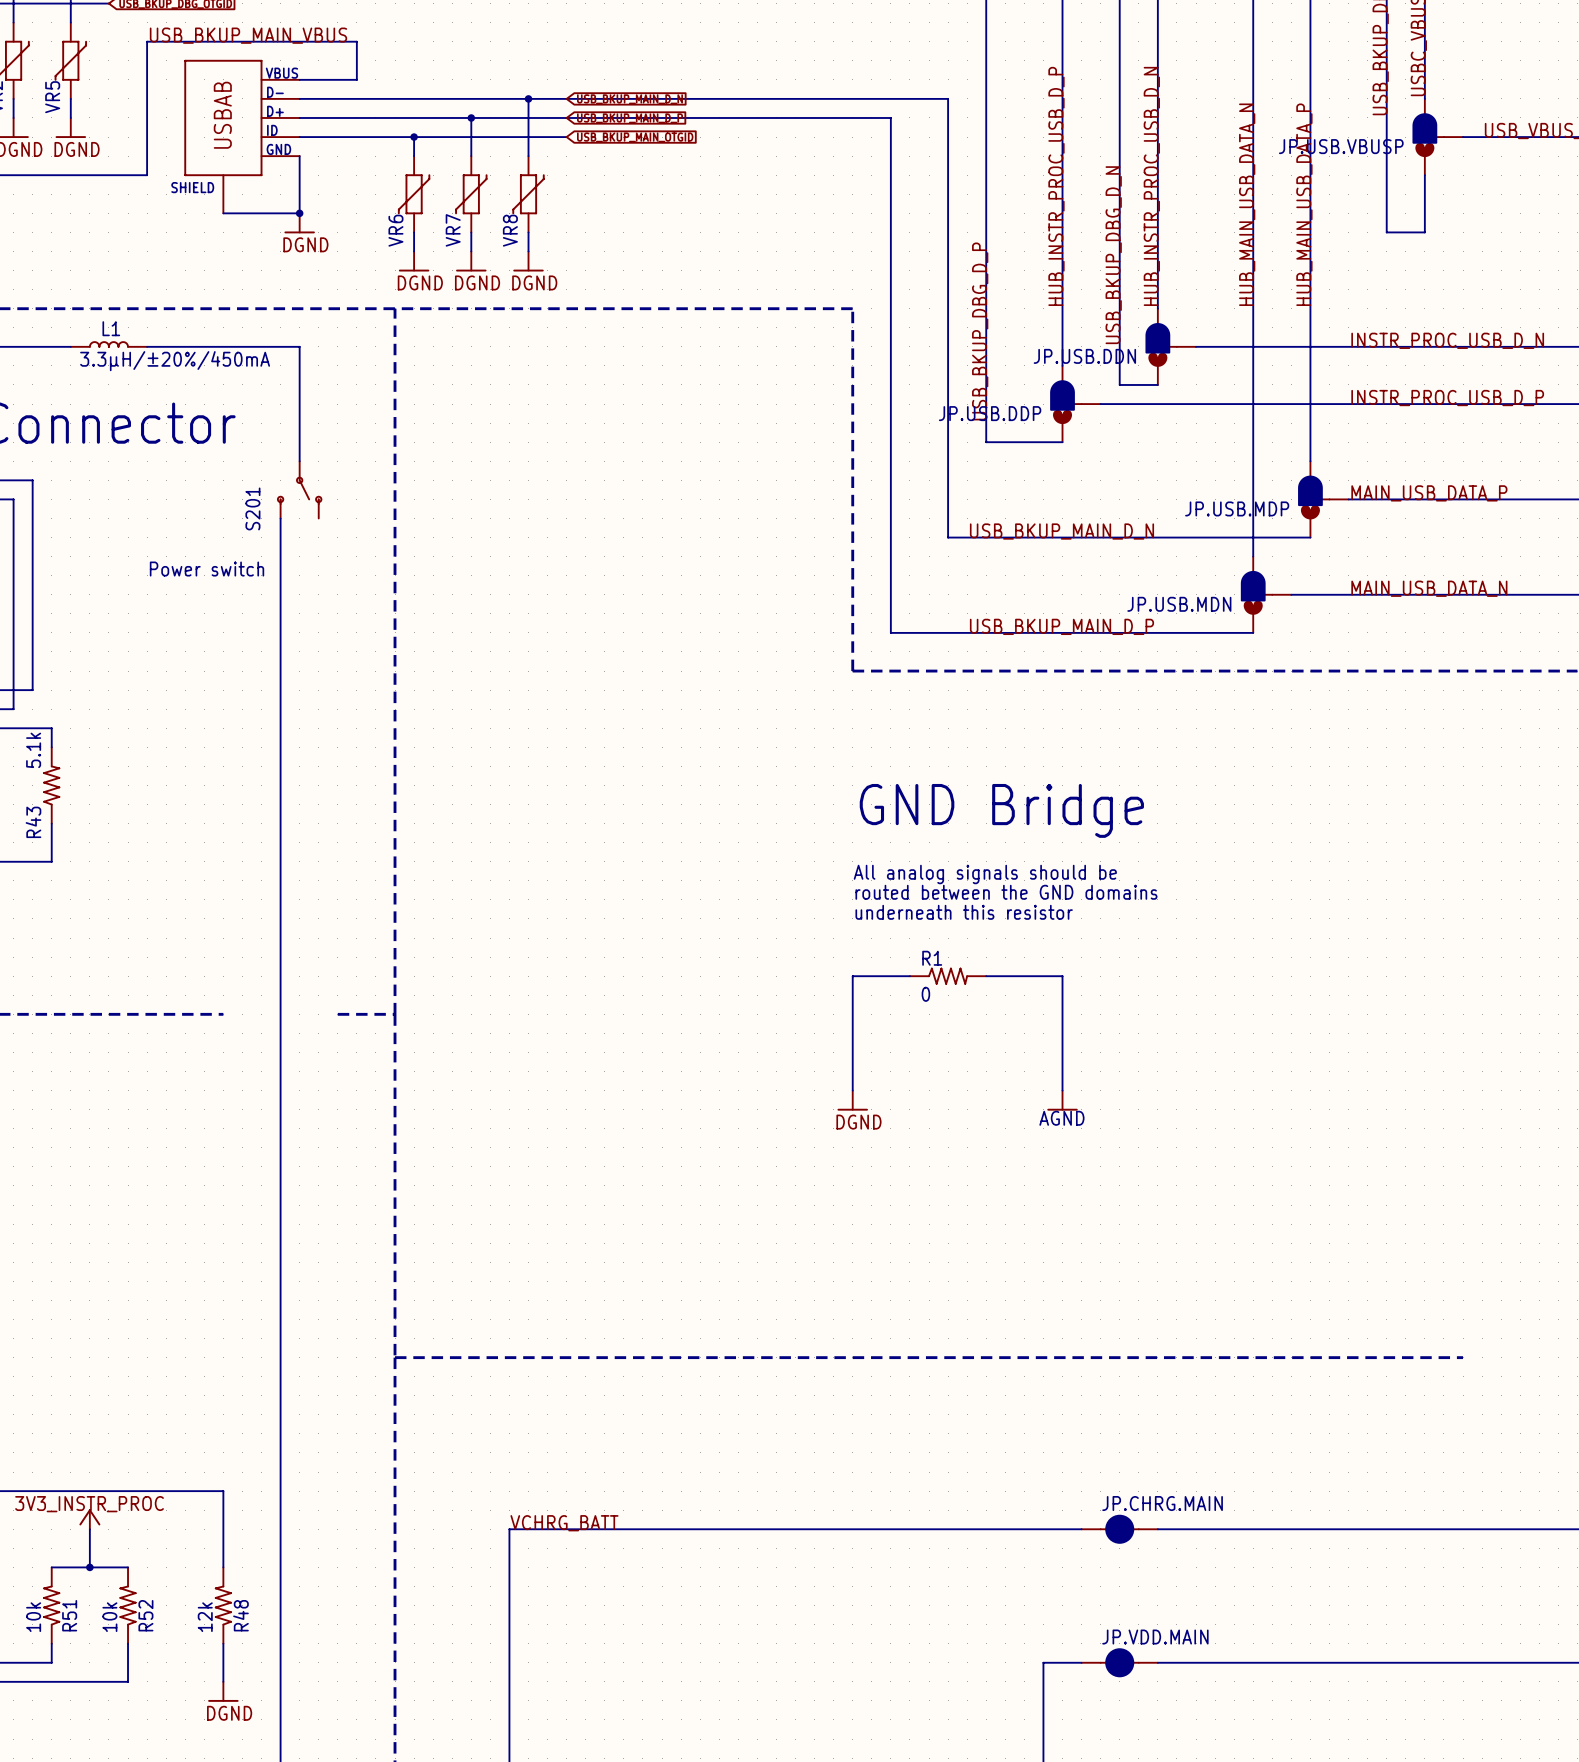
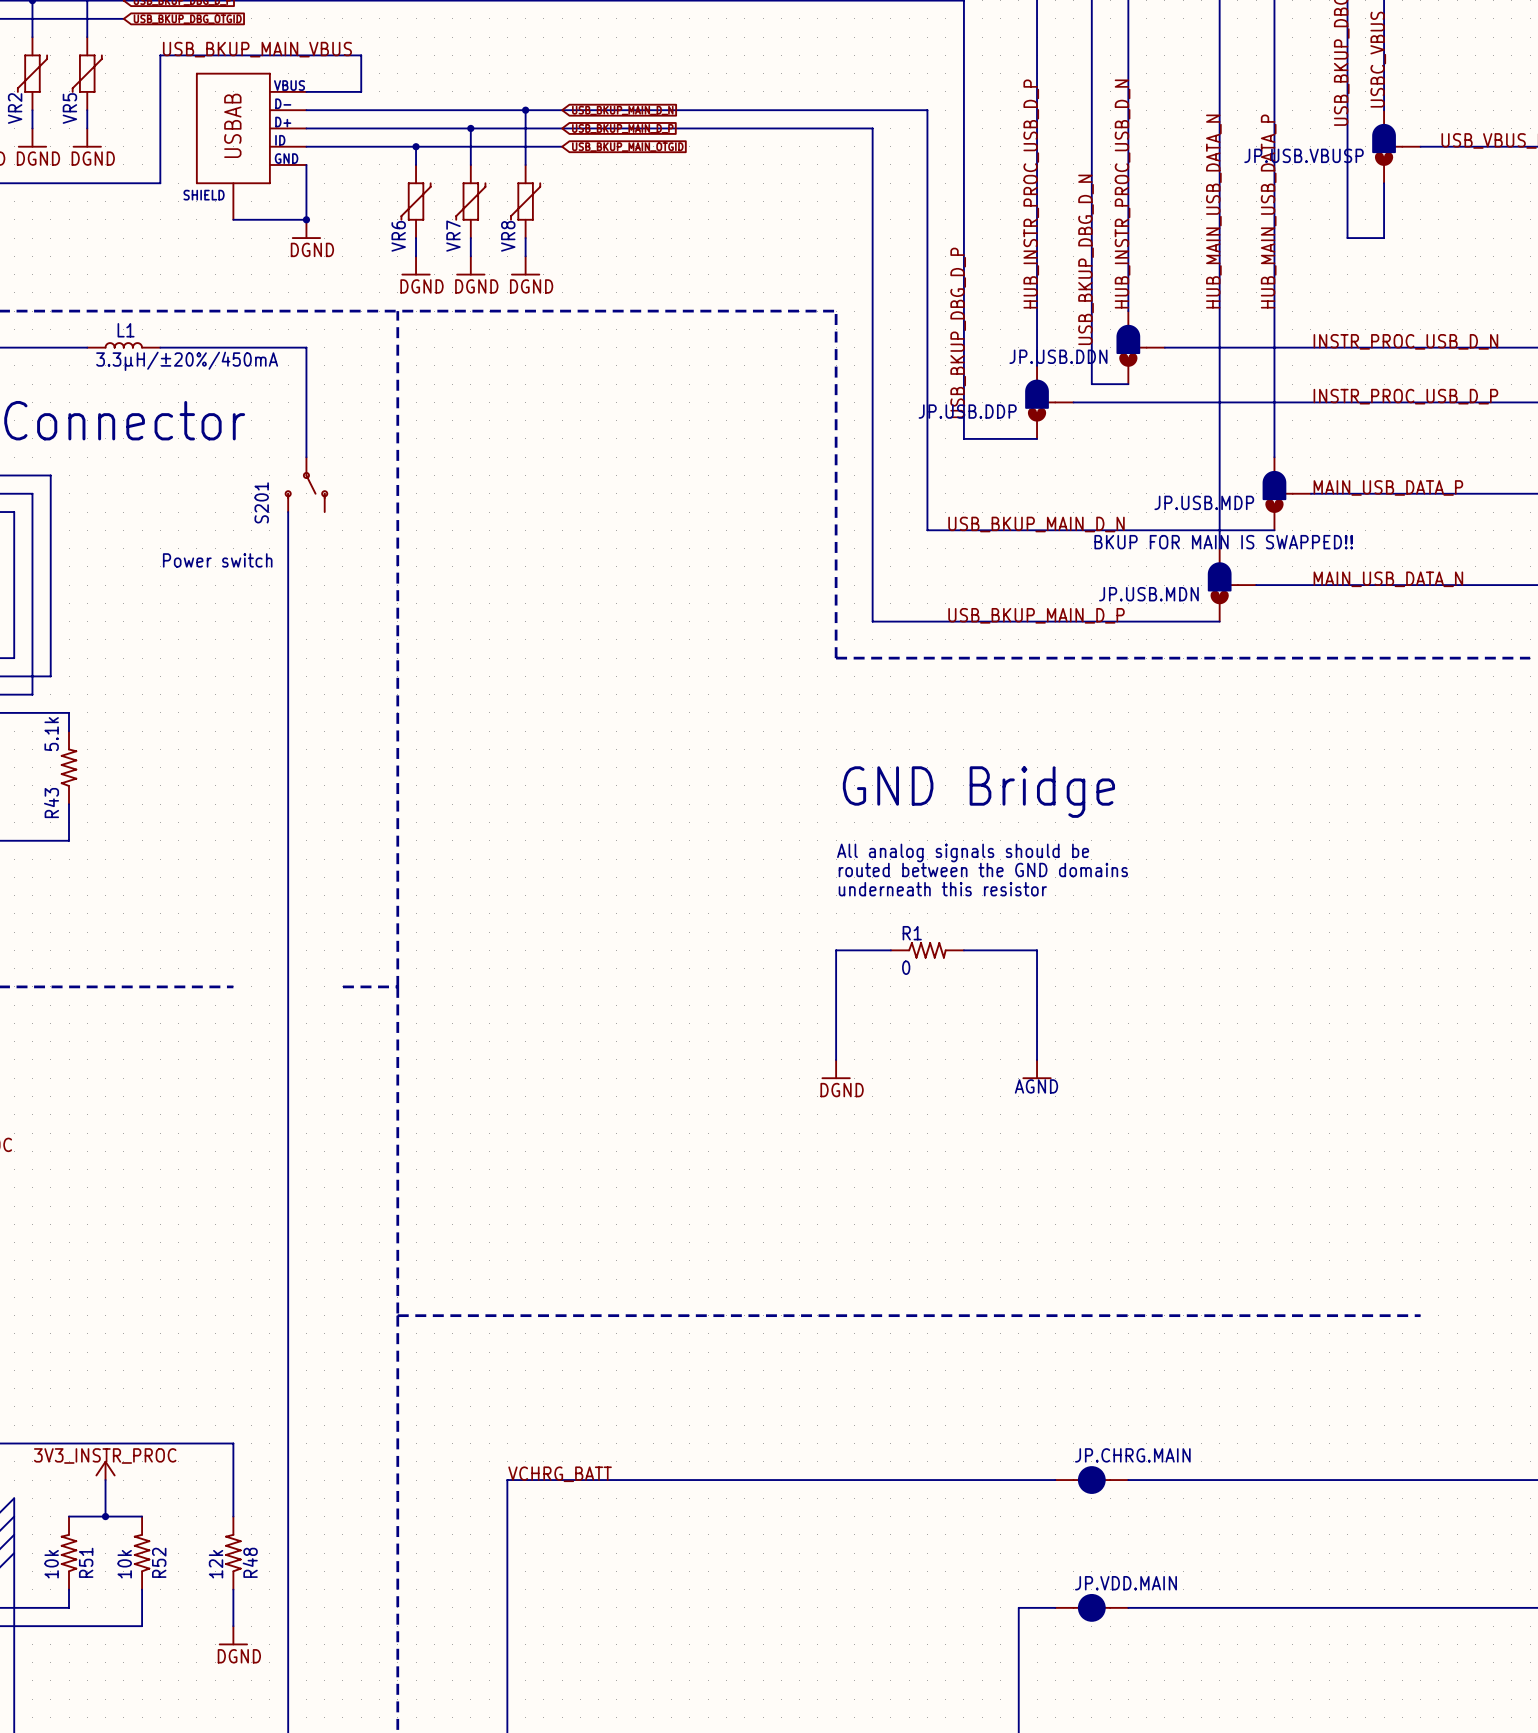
text: none -> BKUP FOR MAIN IS SWAPPED!! (1223, 542)

